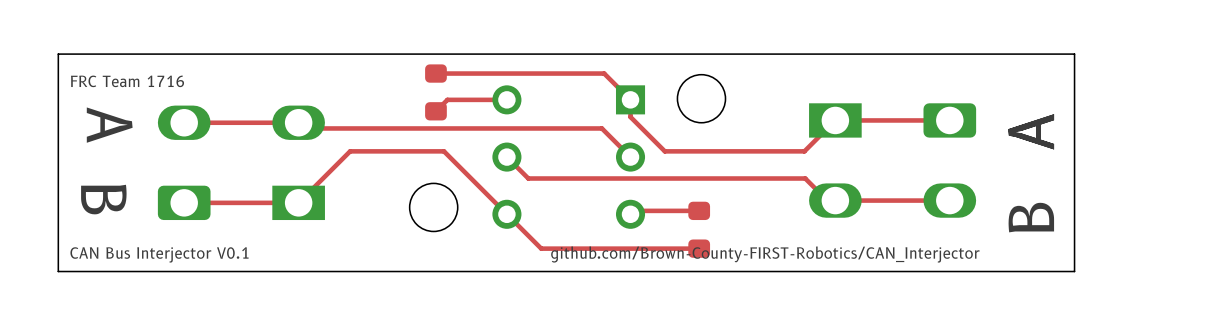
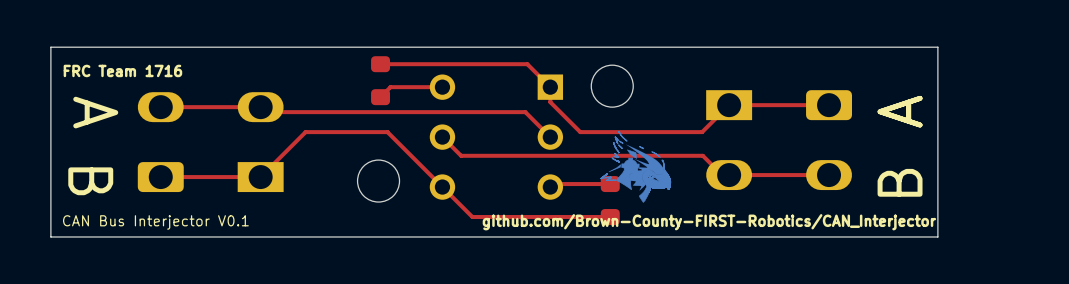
bottom track: none -> (620, 133) (619, 132) (619, 132) (618, 131) (620, 133)
bottom track: none -> (620, 134) (623, 137)
bottom track: none -> (623, 137) (626, 141)
bottom track: none -> (616, 138) (618, 140)
bottom track: none -> (619, 141) (622, 143)
bottom track: none -> (613, 142) (613, 143)
bottom track: none -> (613, 142) (614, 143)
drawing: none -> [608, 144, 672, 203]
bottom track: none -> (618, 145) (619, 145)
bottom track: none -> (619, 146) (620, 147)
bottom track: none -> (639, 146) (642, 147)
bottom track: none -> (643, 148) (643, 148)
bottom track: none -> (616, 149) (617, 150)
bottom track: none -> (651, 151) (659, 156)
bottom track: none -> (613, 156) (616, 156)
bottom track: none -> (612, 157) (612, 158)
bottom track: none -> (613, 158) (615, 160)
bottom track: none -> (663, 161) (663, 164)
bottom track: none -> (605, 175) (600, 178) (611, 177)
bottom track: none -> (647, 177) (651, 174) (649, 178) (654, 177)
bottom track: none -> (609, 178) (608, 179)
bottom track: none -> (607, 180) (606, 180)
bottom track: none -> (615, 180) (606, 180)

